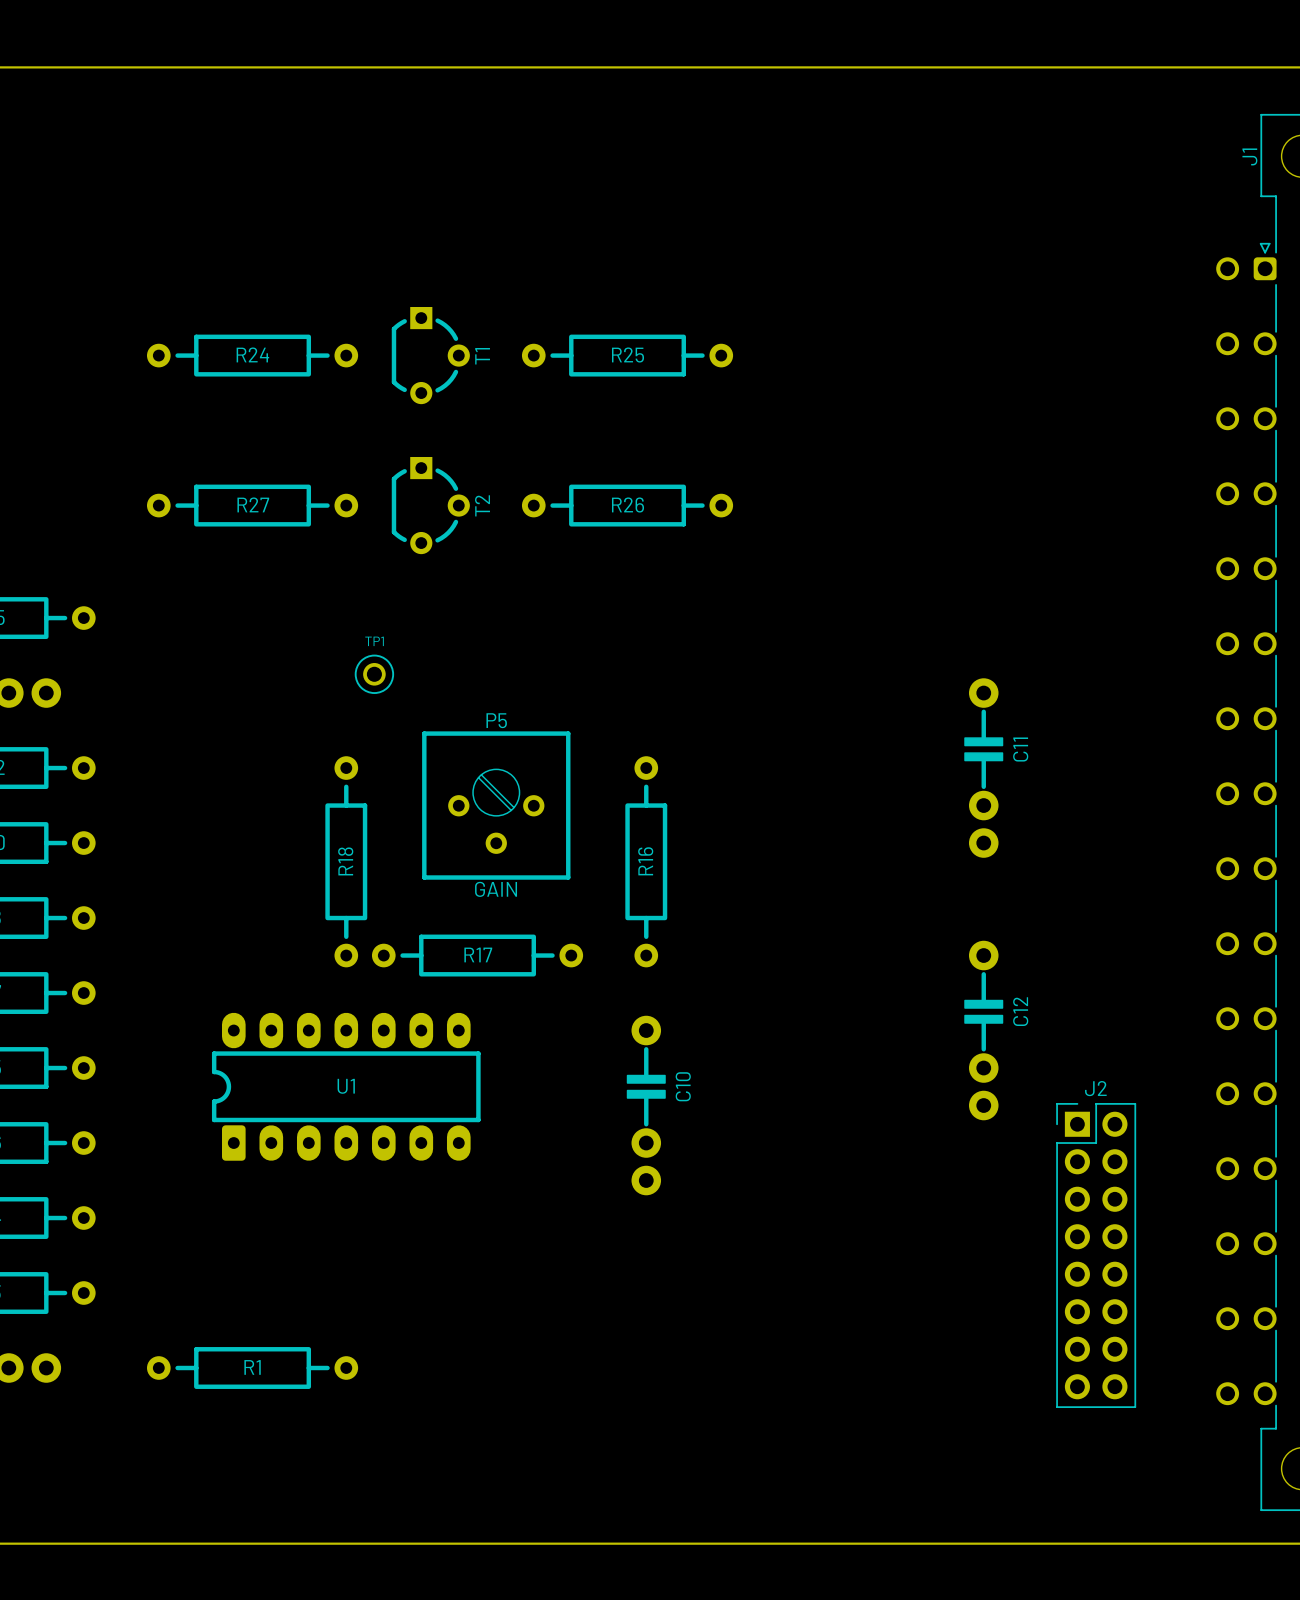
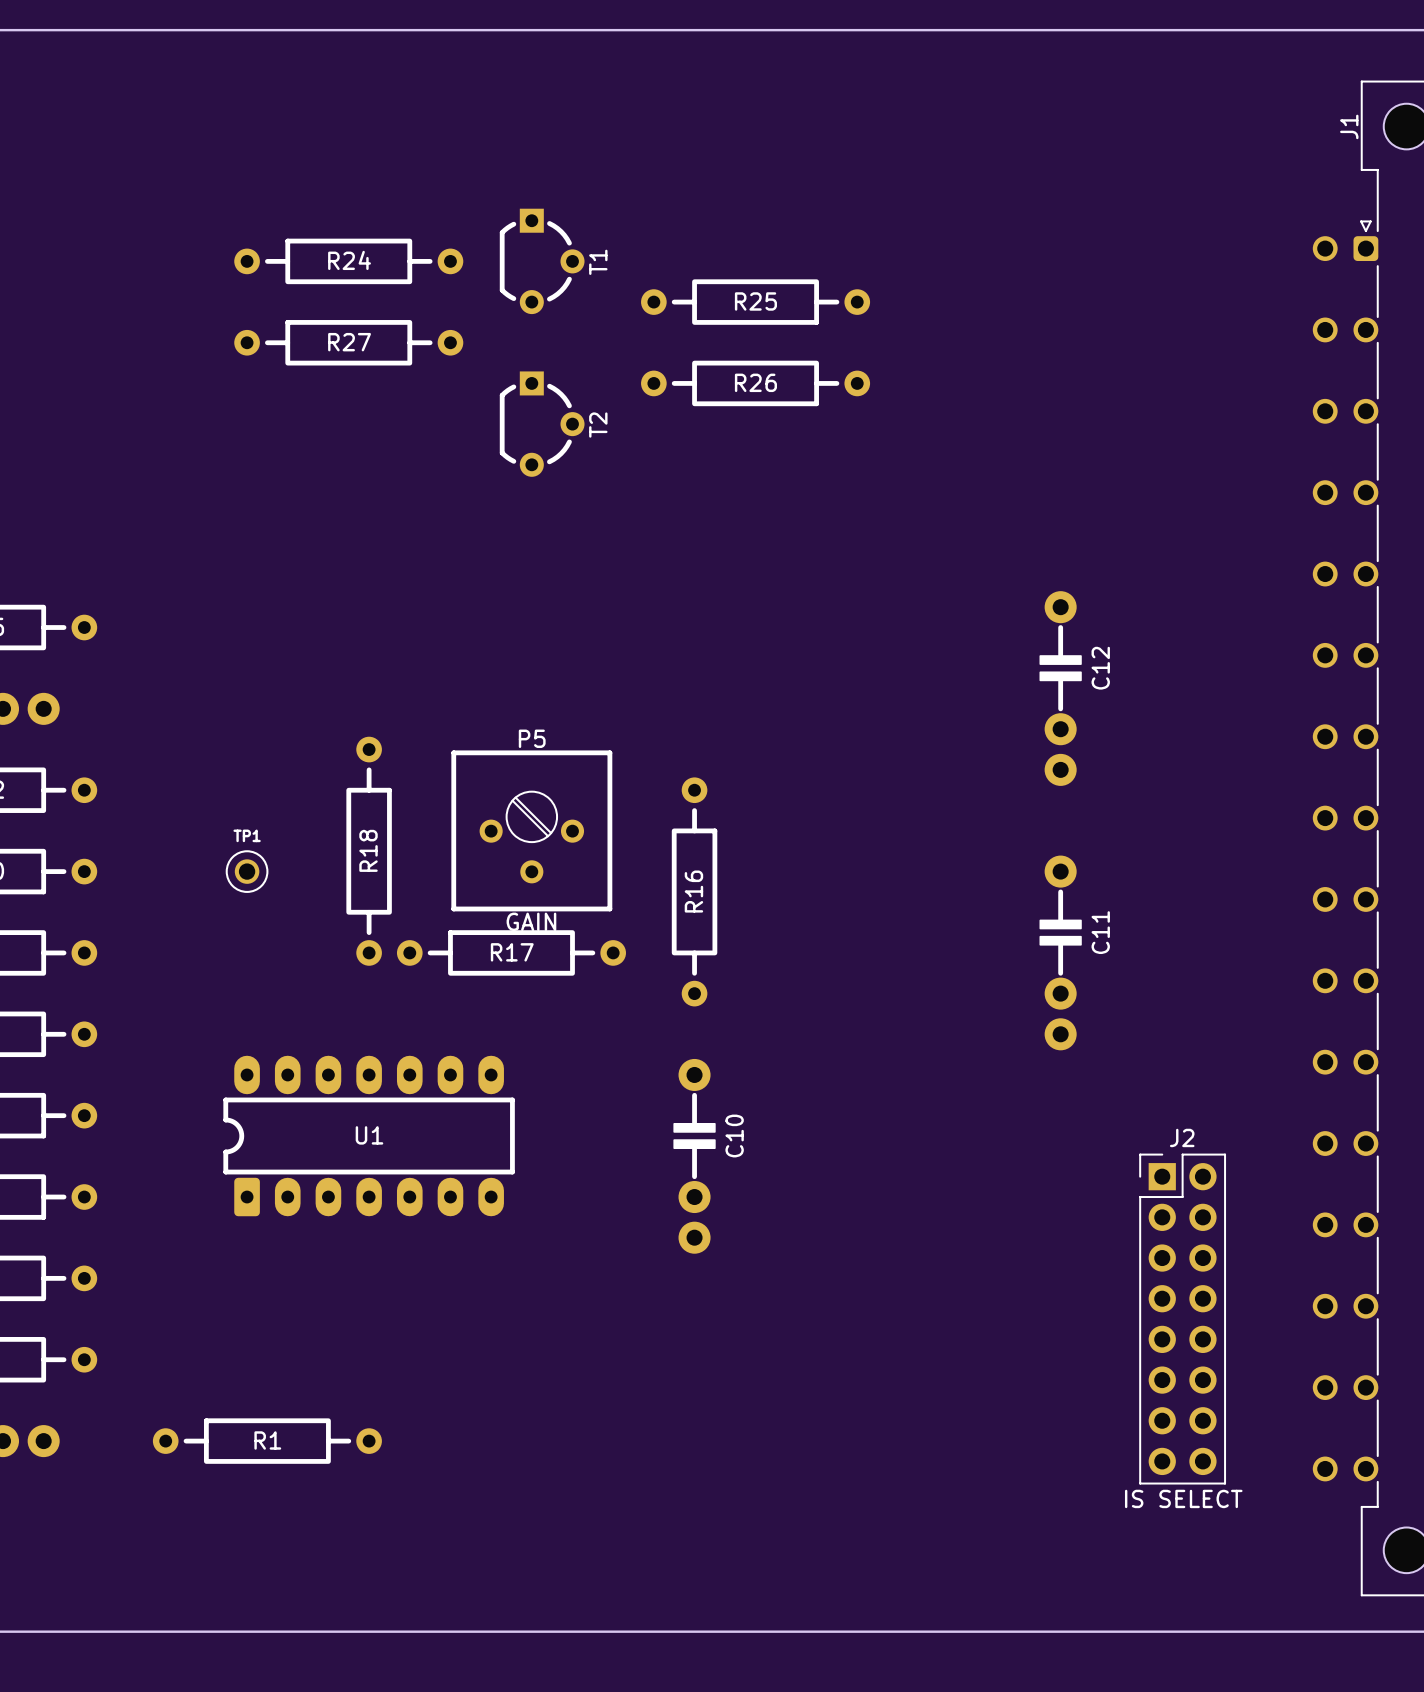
R24 position: (252, 355) -> (348, 261)
T1 position: (430, 355) -> (542, 261)
R25 position: (627, 355) -> (755, 302)
R27 position: (252, 505) -> (348, 342)
T2 position: (430, 505) -> (542, 424)
R26 position: (627, 505) -> (755, 383)
TP1 position: (374, 674) -> (247, 871)
C11 position: (983, 768) -> (1060, 952)
R18 position: (346, 861) -> (369, 851)
R17 position: (477, 955) -> (511, 952)
C12 position: (983, 1030) -> (1060, 688)
J2 value: none -> IS SELECT (1183, 1498)

